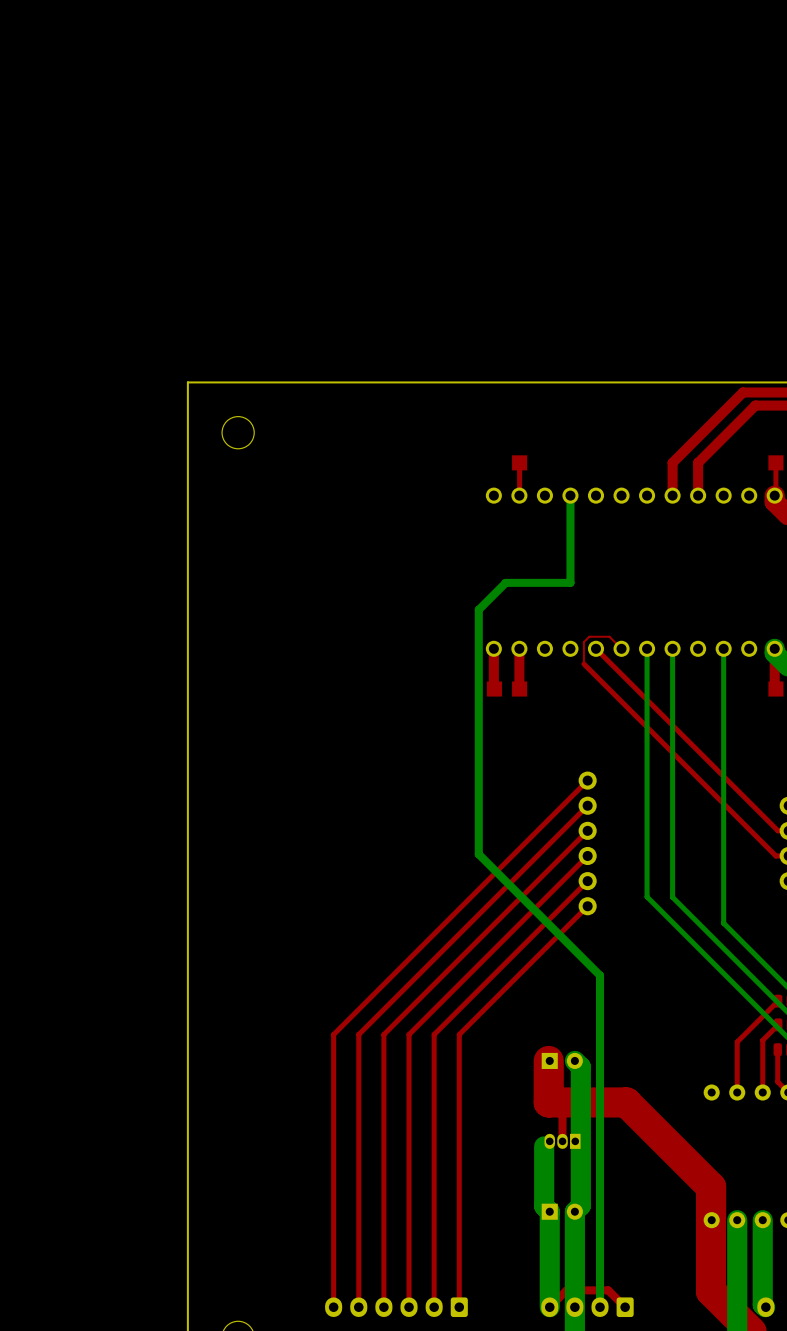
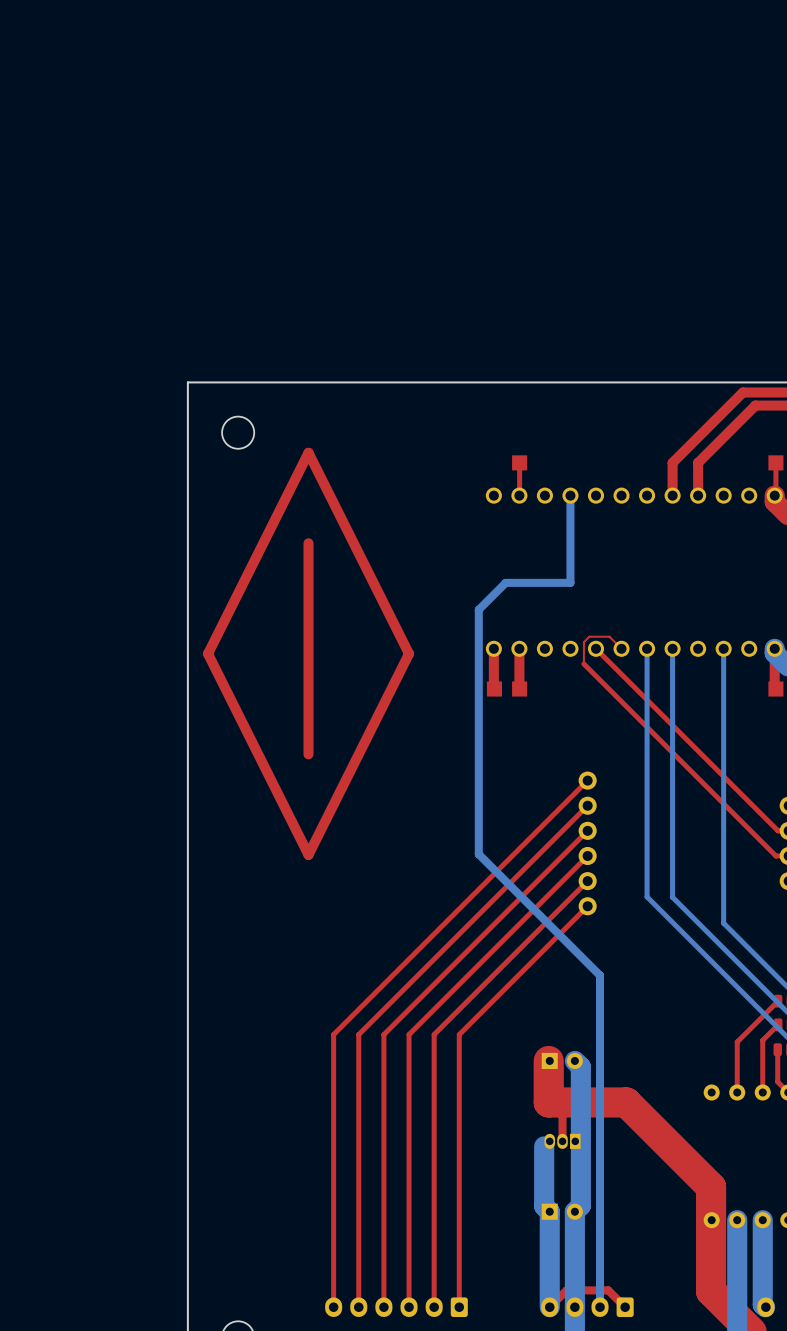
top track: none -> (308, 452) (409, 653) (308, 854) (207, 653) (308, 452)
top track: none -> (308, 543) (308, 754)

